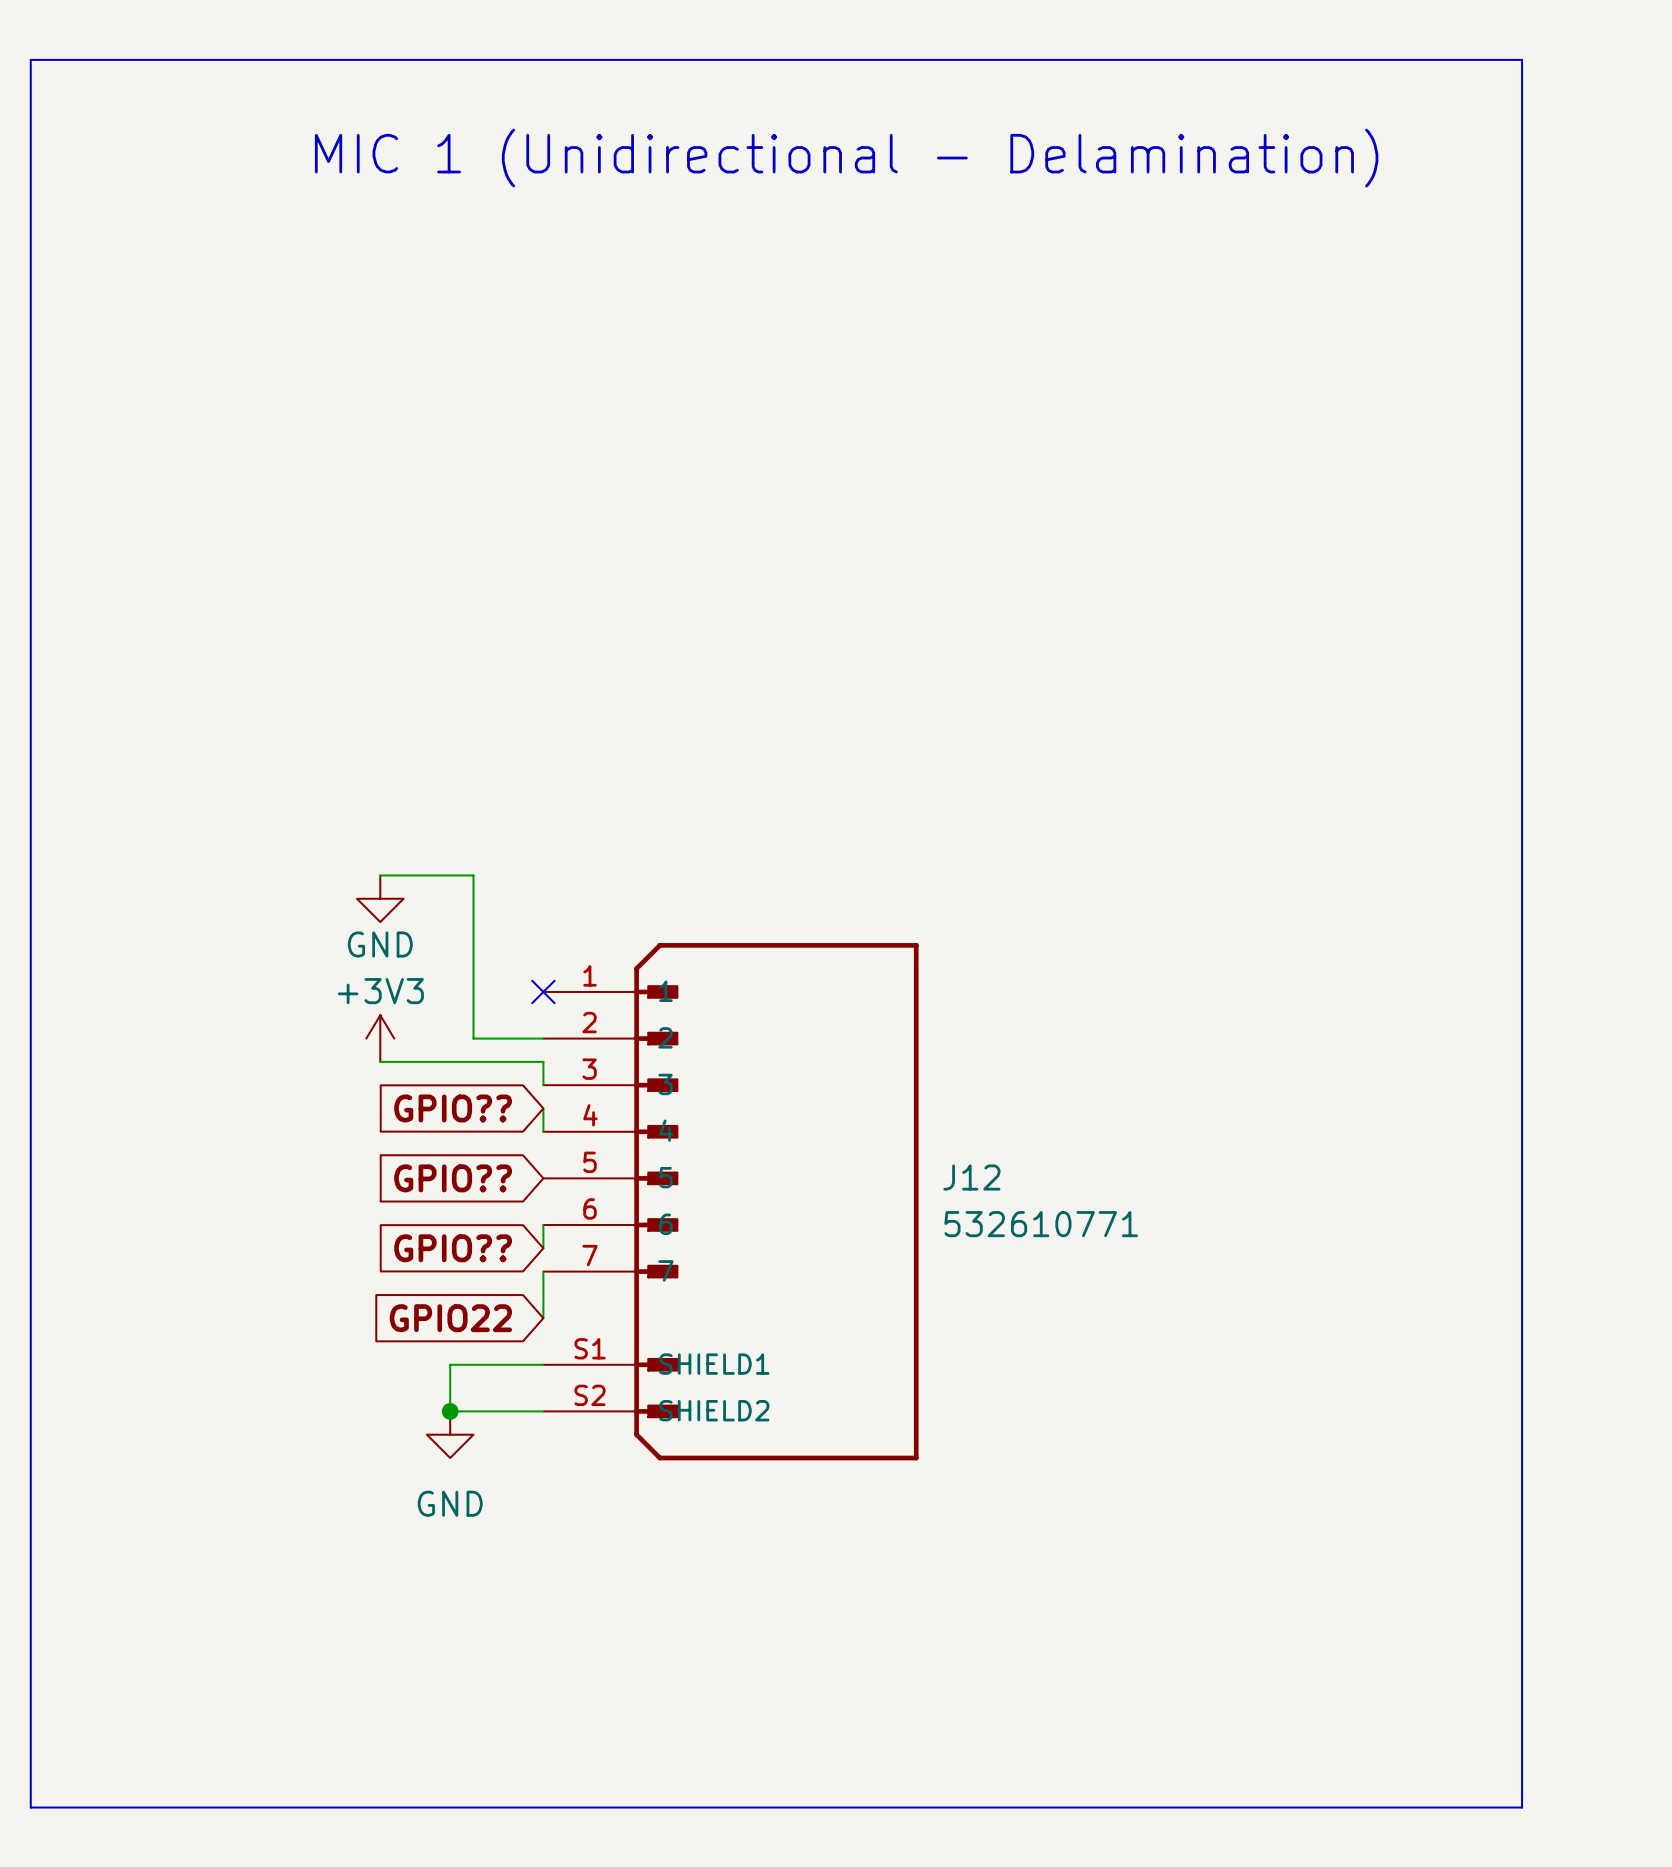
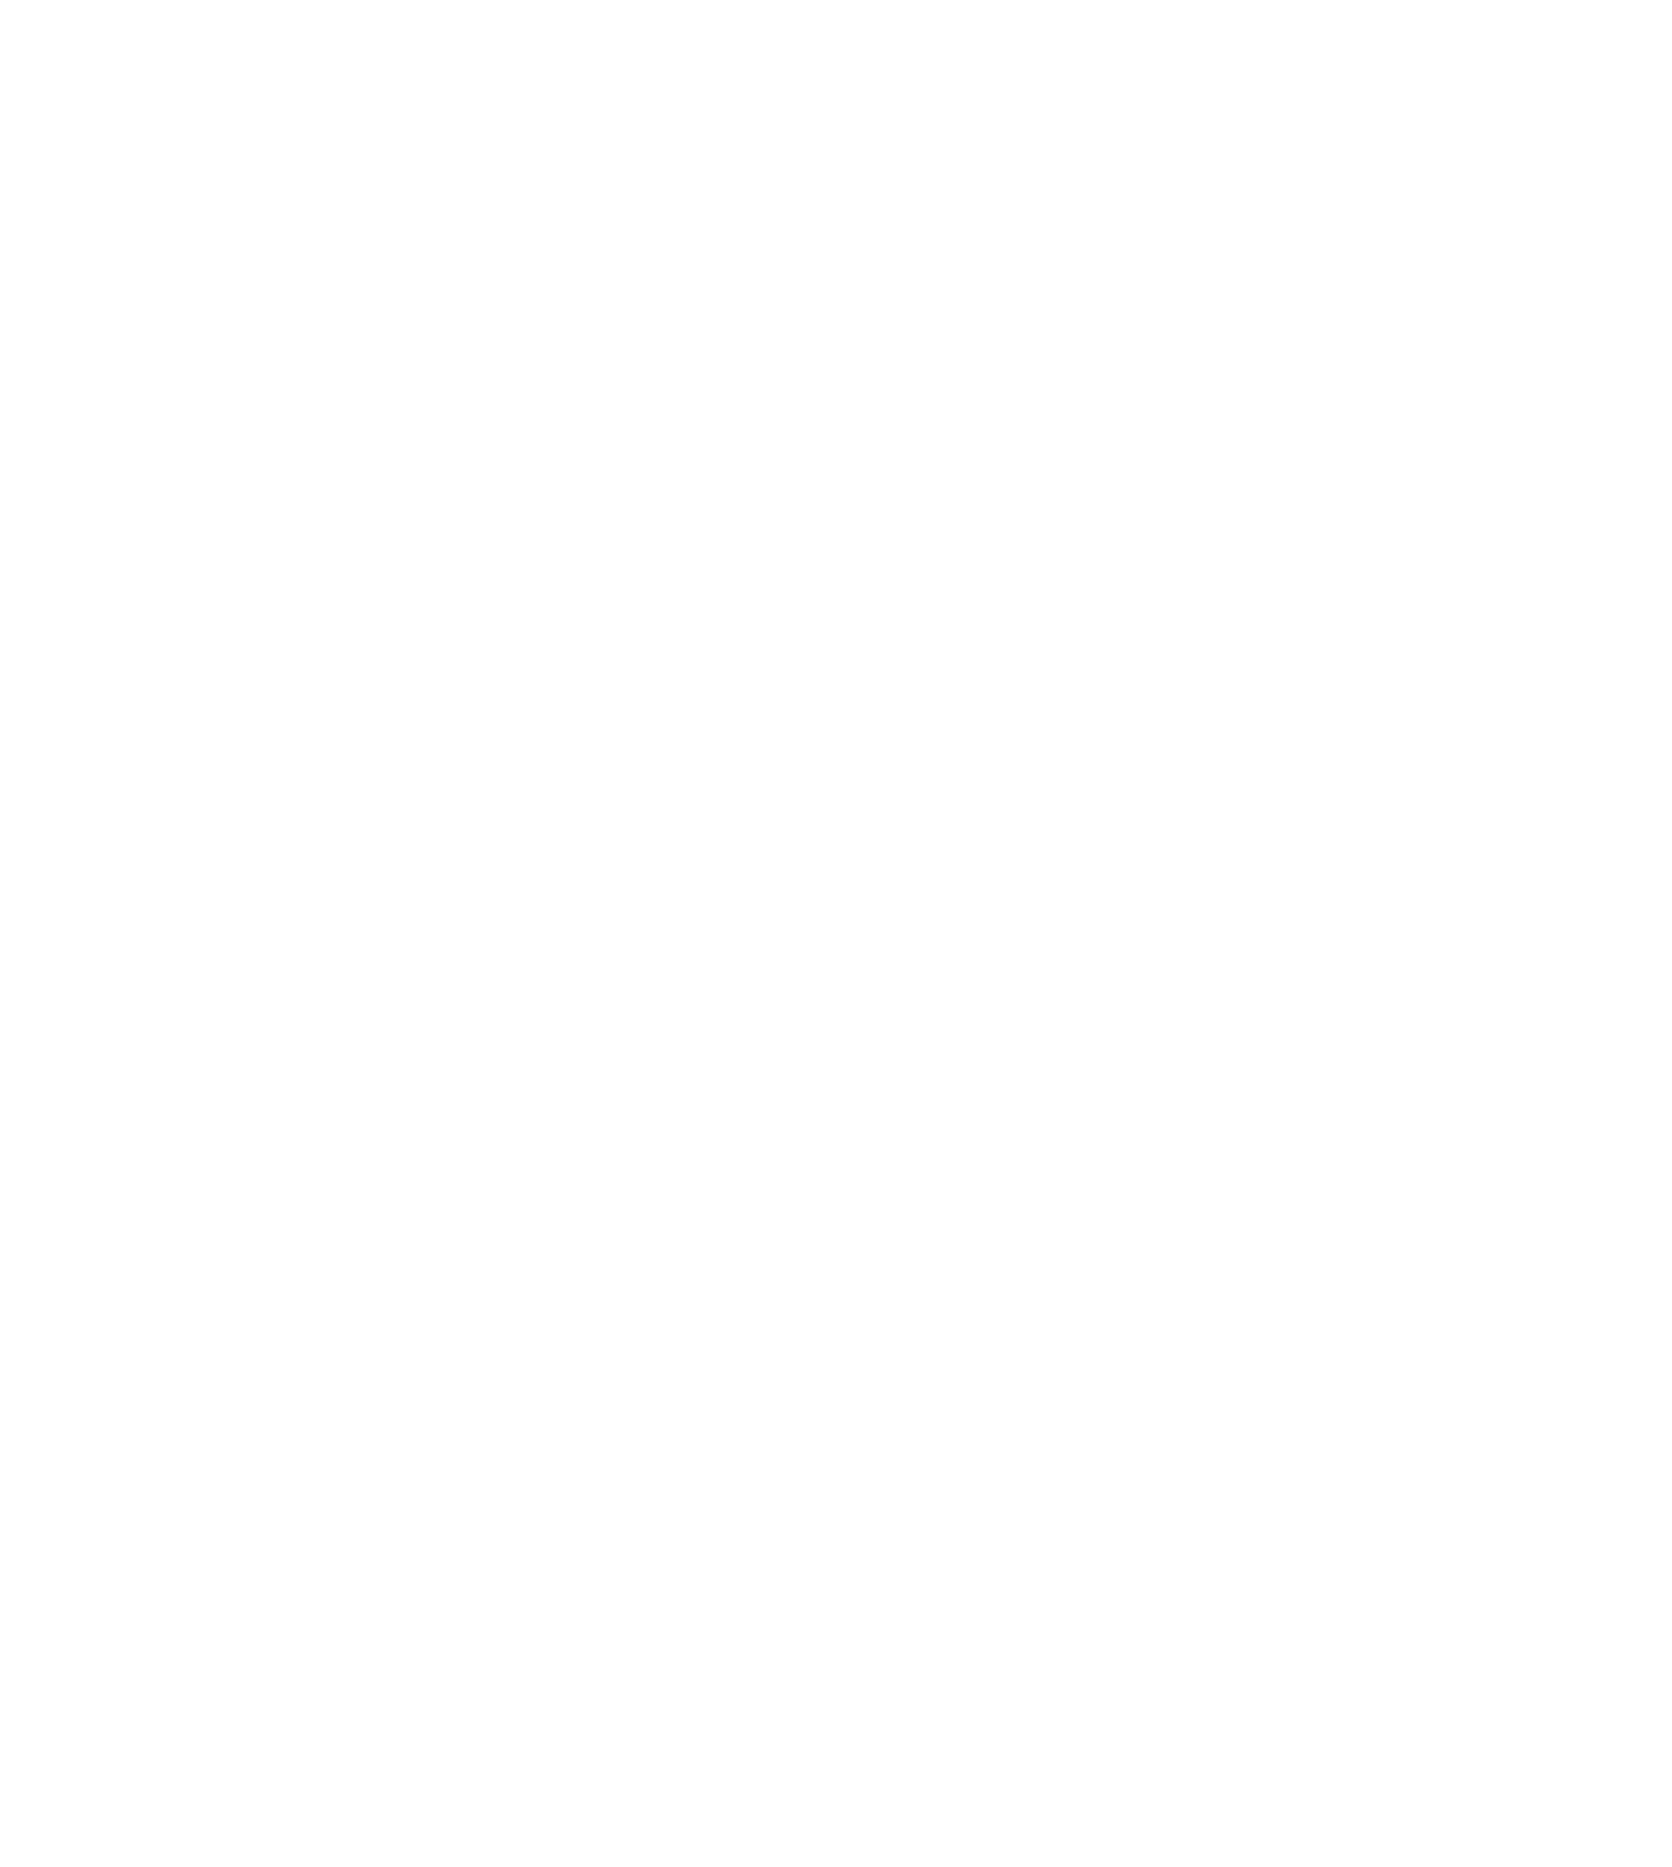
line: (30, 59) (1522, 59) (1522, 1807) (30, 1807) (30, 59) -> none
text: MIC 1 (Unidirectional - Delamination) (846, 158) -> none
wire: (380, 875) (473, 875) (473, 1038) (543, 1038) -> none
power symbol: GND (380, 898) -> none
no-connect mark: (543, 991) -> none
power symbol: +3V3 (380, 1038) -> none
wire: (380, 1061) (543, 1061) (543, 1085) -> none
global label: GPIO?? (453, 1108) -> none
wire: (543, 1108) (543, 1131) -> none
global label: GPIO?? (453, 1178) -> none
J12: 532610771 (730, 1201) -> none
wire: (543, 1224) (543, 1248) -> none
global label: GPIO?? (453, 1248) -> none
wire: (543, 1271) (543, 1318) -> none
global label: GPIO22 (450, 1318) -> none
wire: (543, 1364) (450, 1364) (450, 1411) (543, 1411) -> none
junction: (450, 1411) -> none
power symbol: GND (450, 1434) -> none

